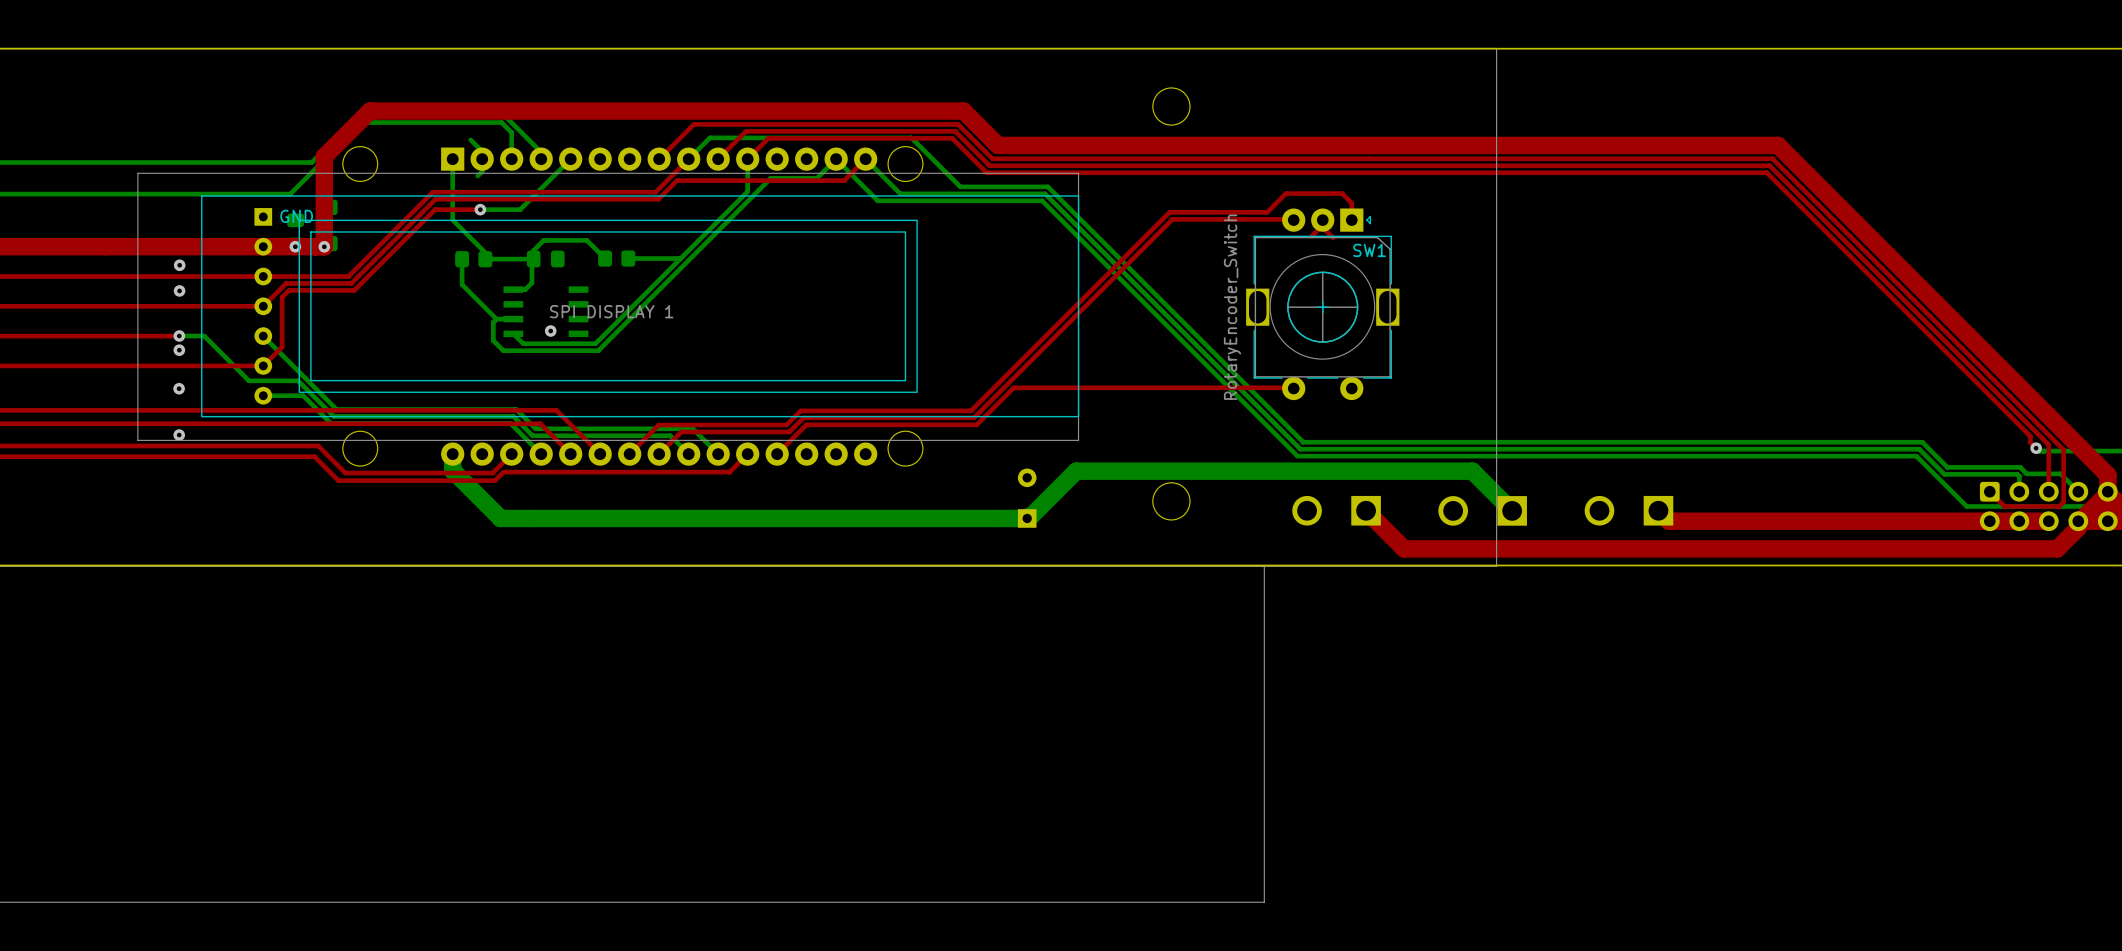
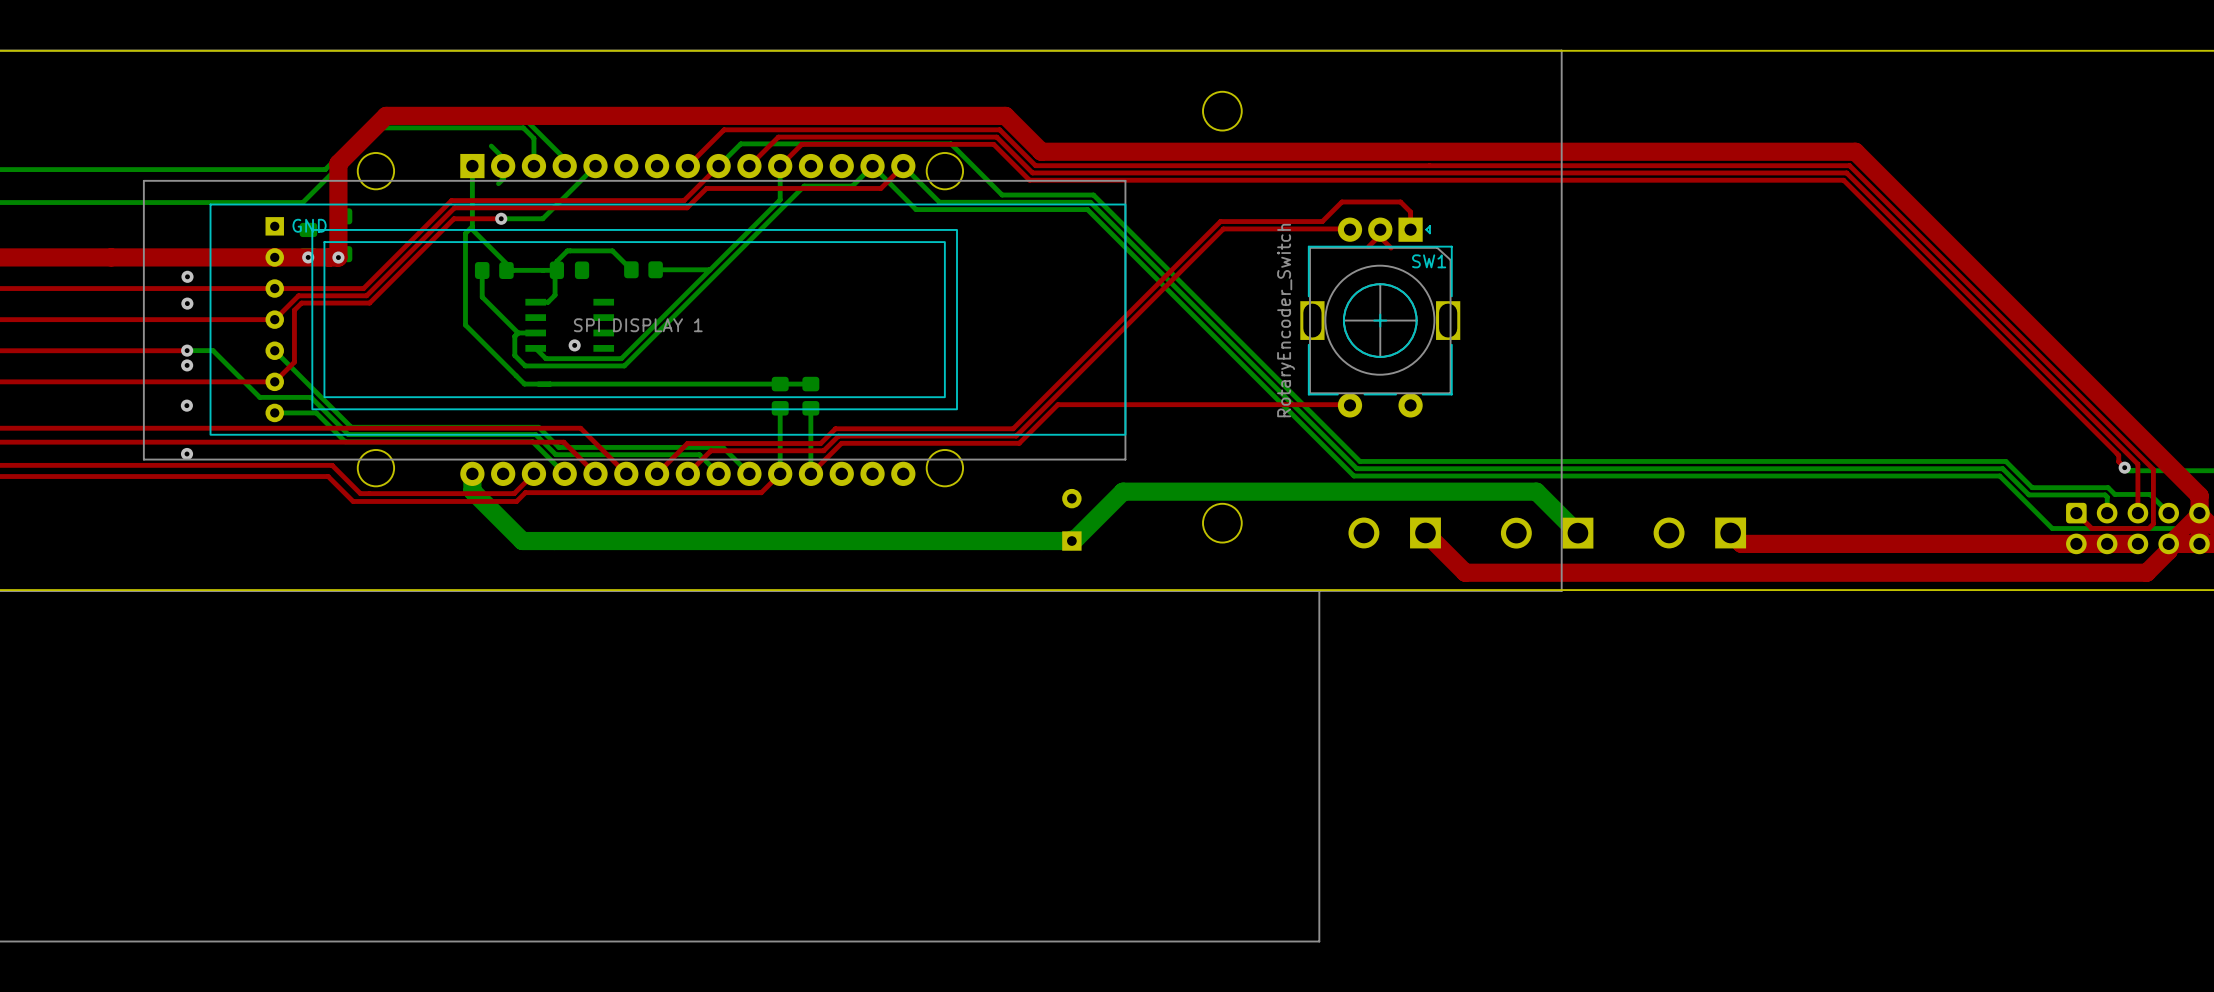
bottom track: none -> (472, 226) (465, 233) (465, 325) (524, 384) (810, 384)
part: none -> (780, 396)
part: none -> (810, 396)
bottom track: none -> (780, 408) (780, 473)
bottom track: none -> (810, 408) (810, 473)

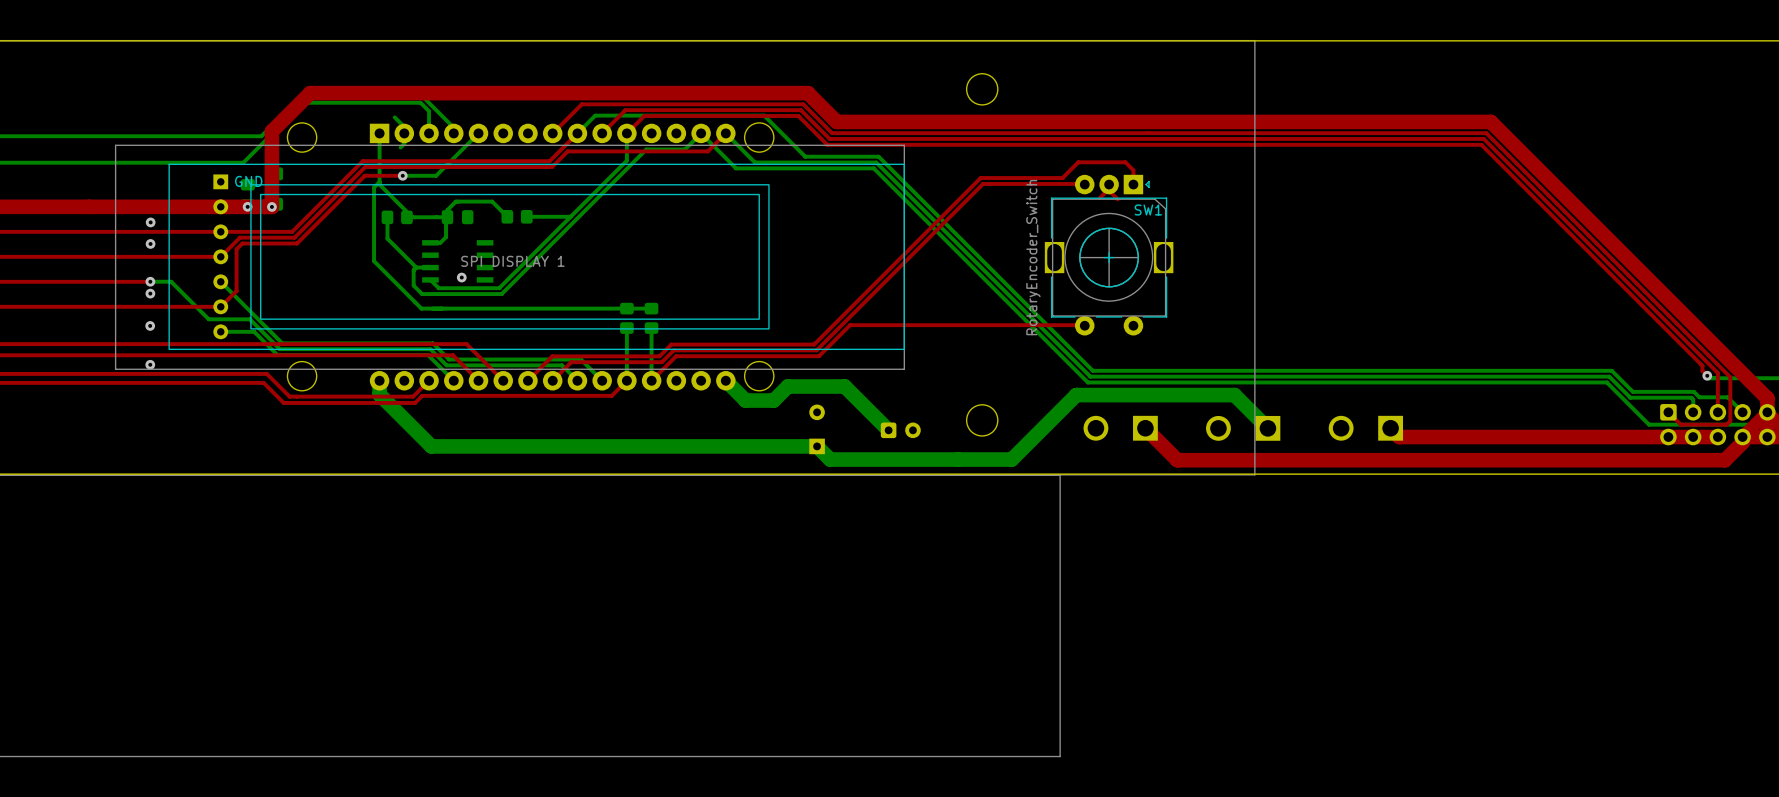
bottom track: none -> (725, 380) (745, 400) (773, 400) (787, 386) (844, 386) (888, 430)
bottom track: (1339, 491) (1123, 491) (1071, 541) (522, 541) -> (1076, 395) (1011, 459) (830, 459) (817, 446) (431, 446) (419, 434)
part position: (1071, 519) -> (817, 429)
part: none -> (900, 430)

